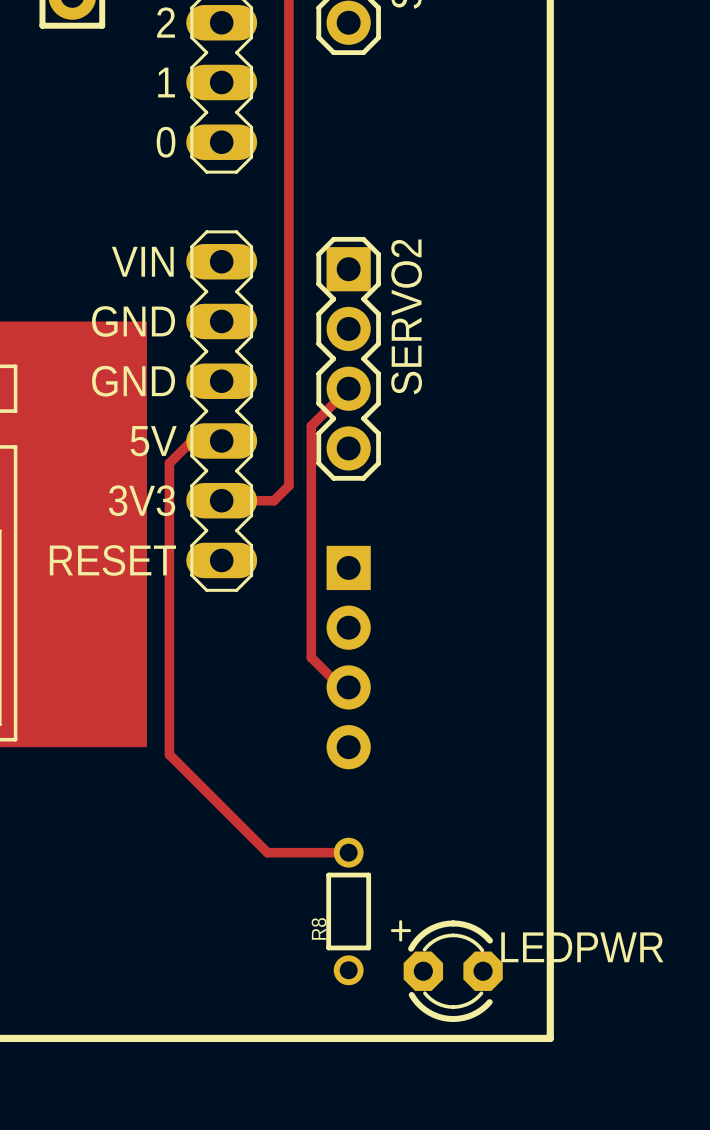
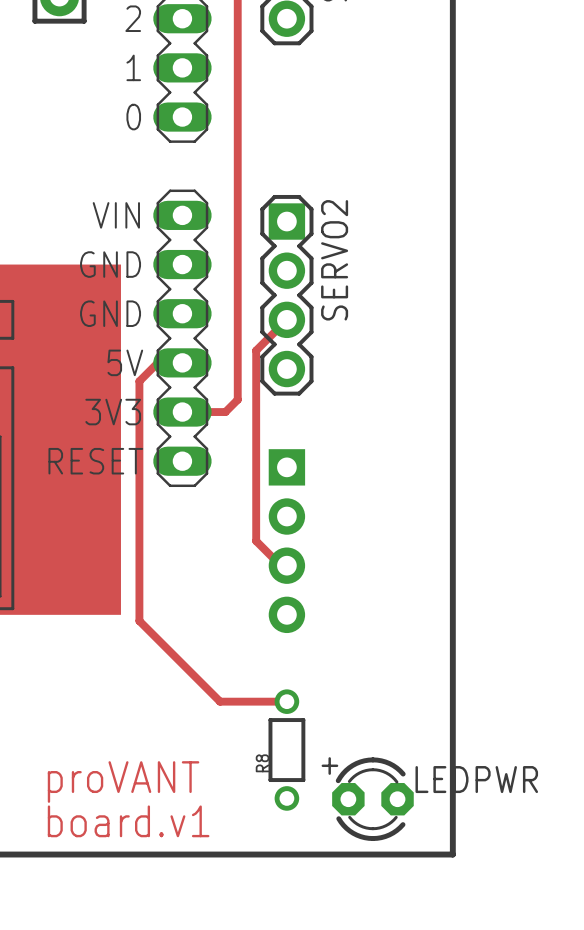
text: none -> proVANT (123, 782)
text: none -> board.v1 (128, 821)

